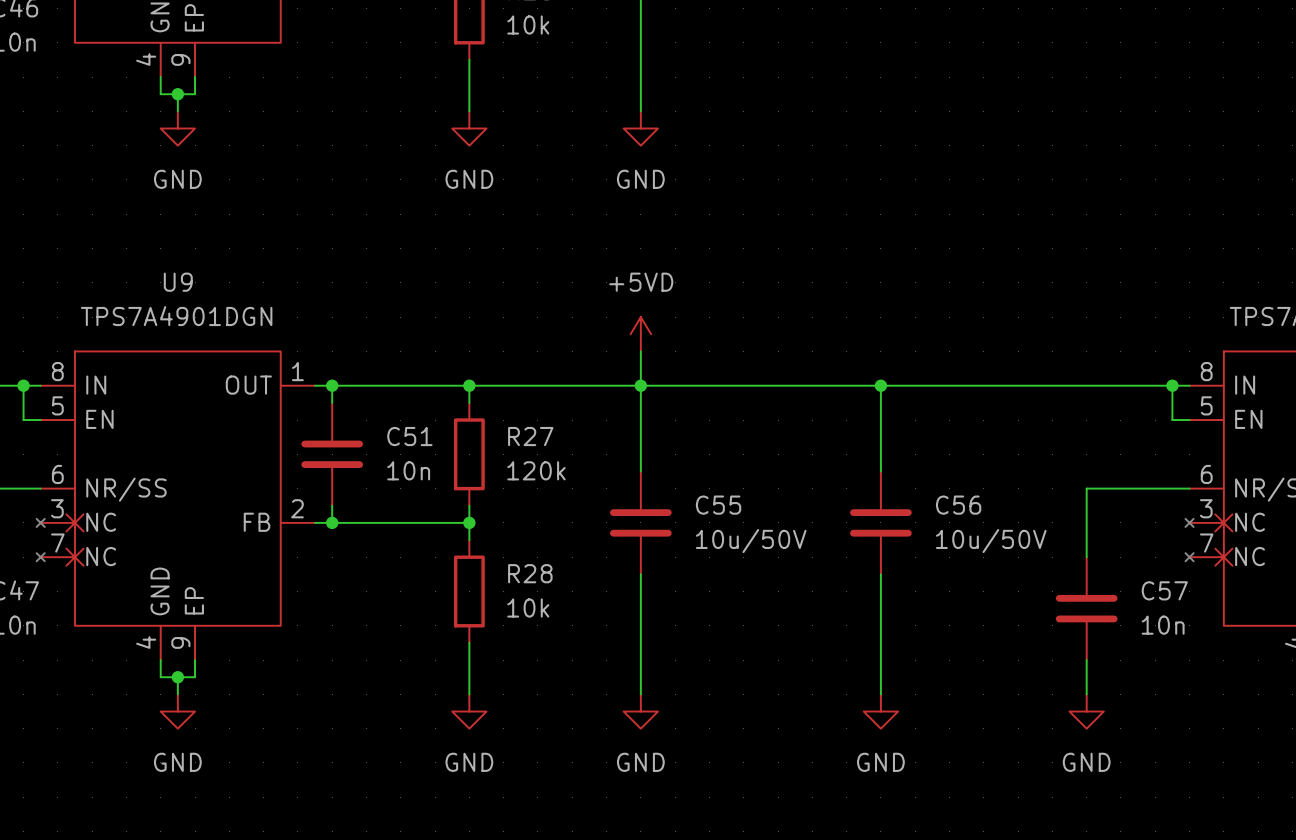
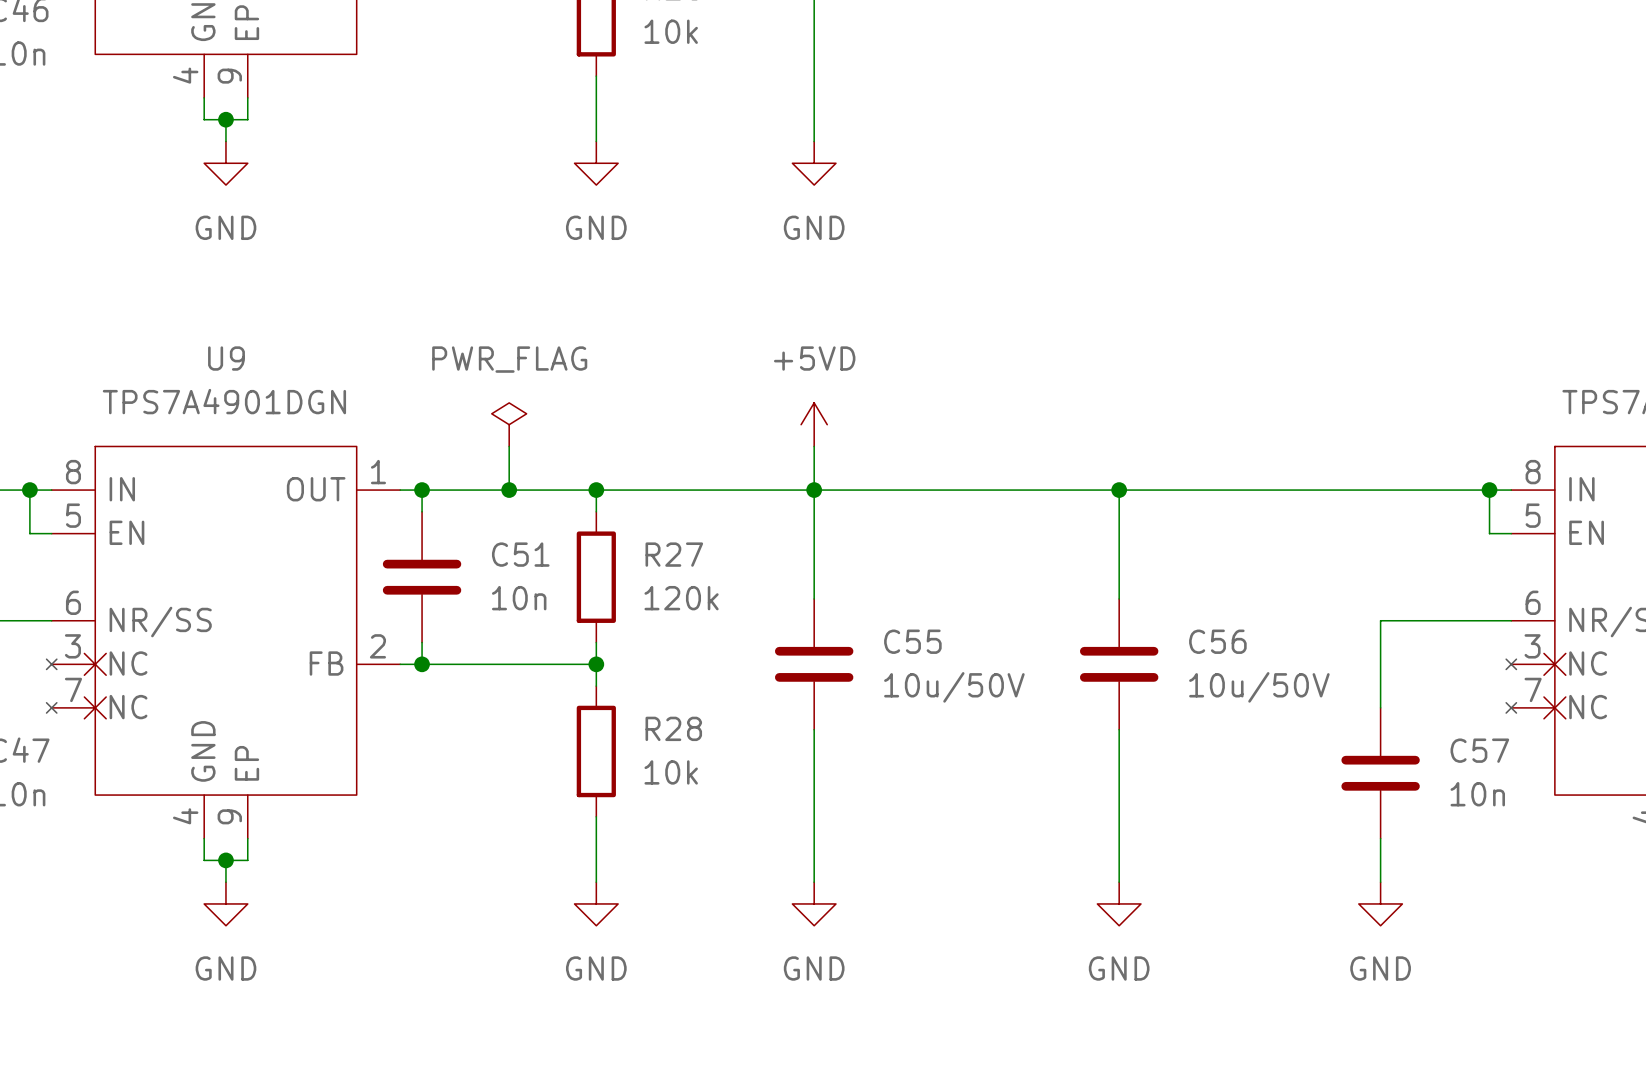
power symbol: none -> PWR_FLAG (509, 424)
wire: none -> (509, 446) (509, 490)
junction: none -> (509, 490)

